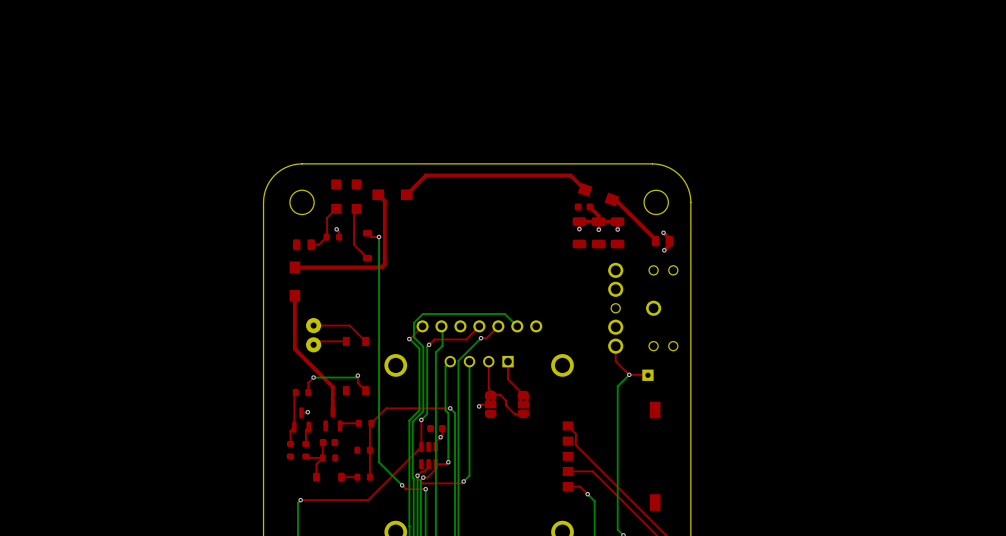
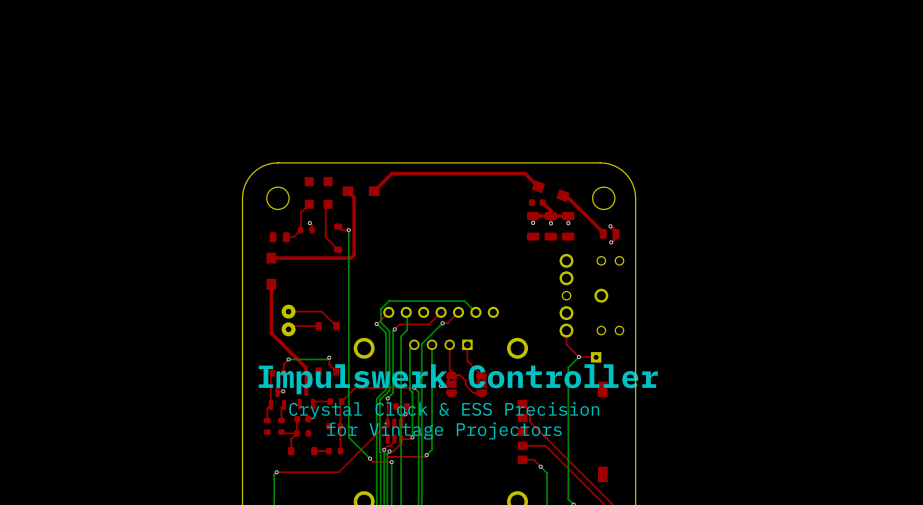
text: none -> Impulswerk Controller (458, 379)
text: none -> Crystal Clock & ESS Precision (444, 410)
text: none -> for Vintage Projectors (444, 431)

